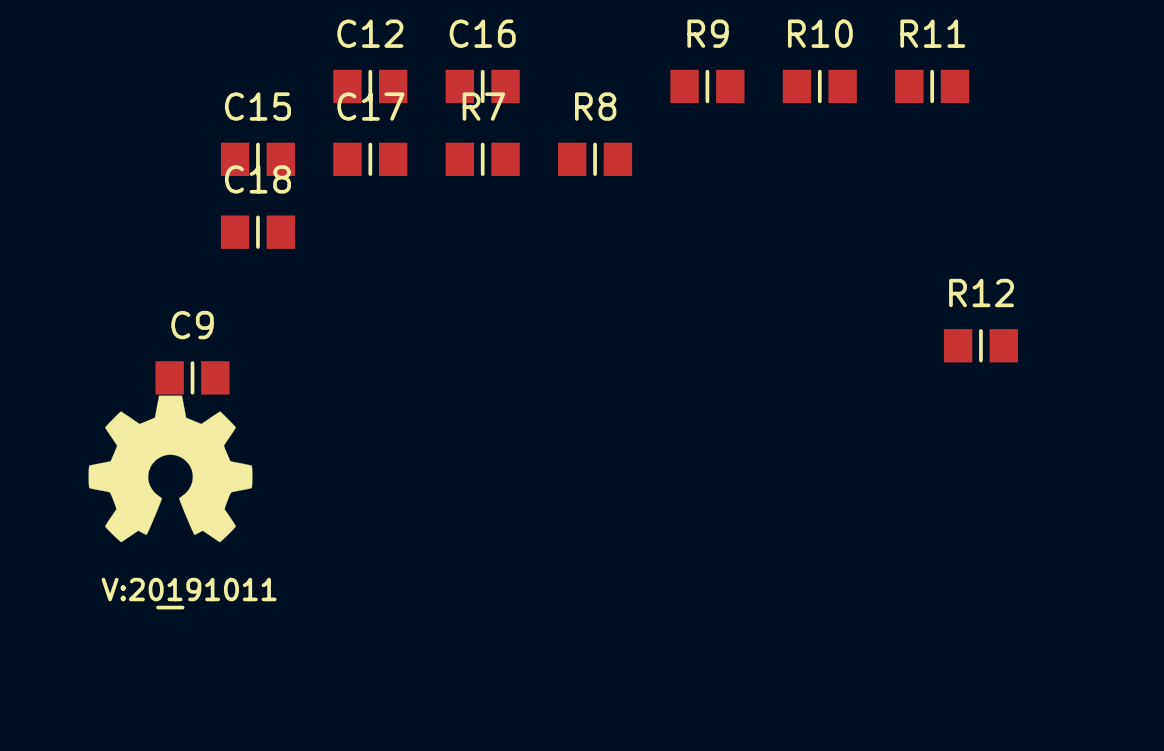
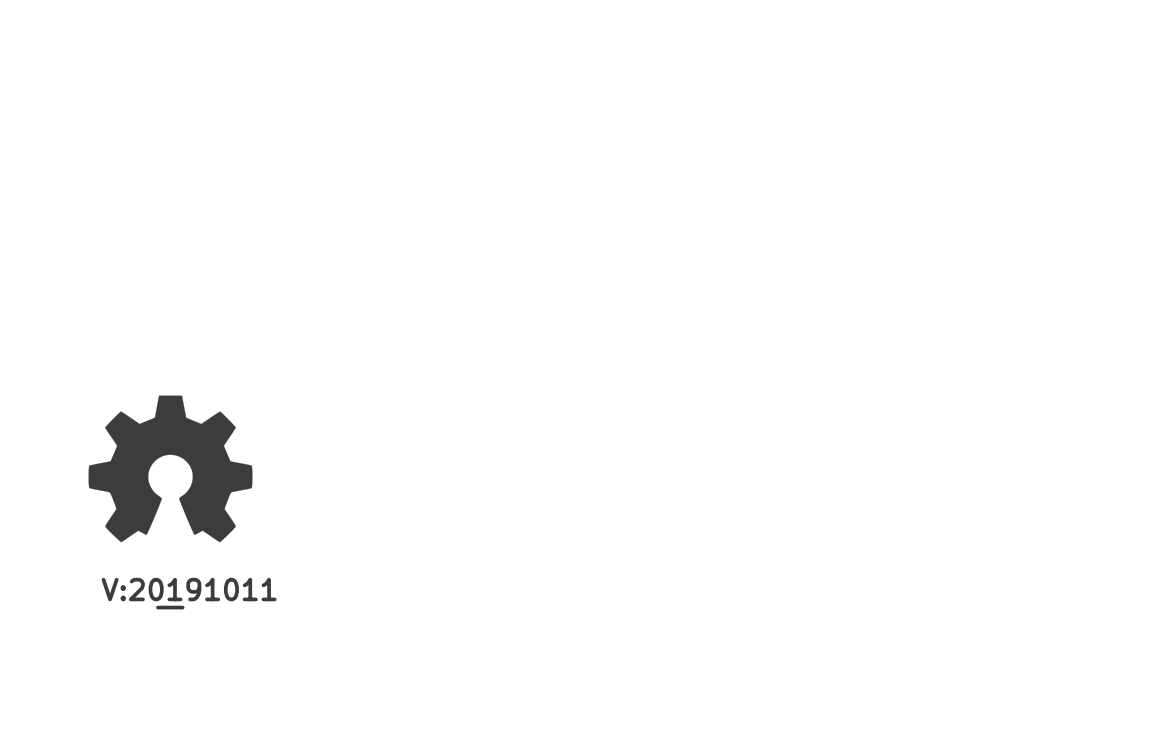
C12: (370, 86) -> none
C16: (482, 86) -> none
R9: (707, 86) -> none
R10: (819, 86) -> none
R11: (932, 86) -> none
C15: (257, 159) -> none
C17: (370, 159) -> none
R7: (482, 159) -> none
R8: (595, 159) -> none
C18: (257, 232) -> none
R12: (980, 345) -> none
C9: (192, 377) -> none

